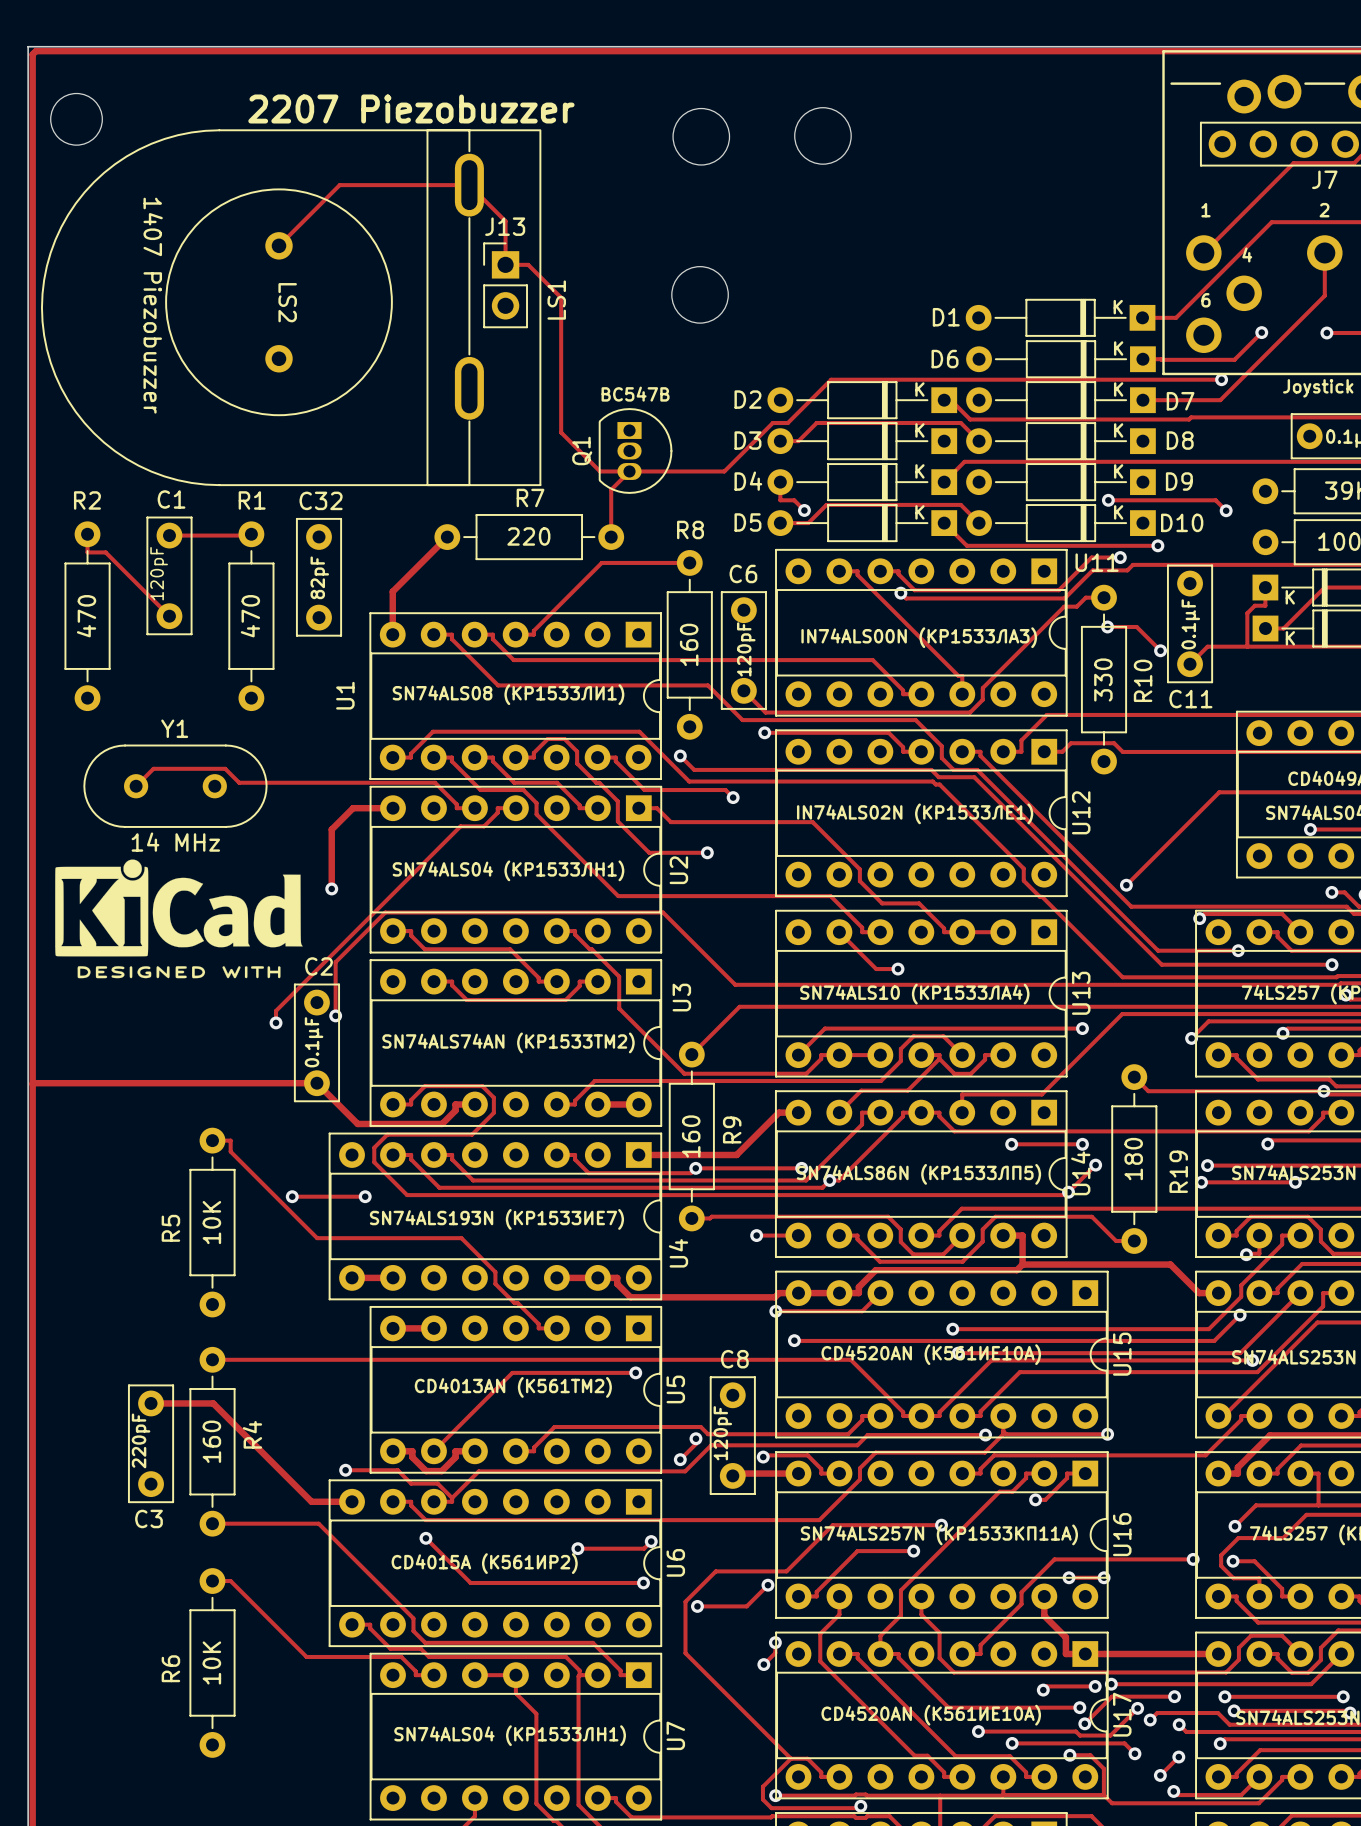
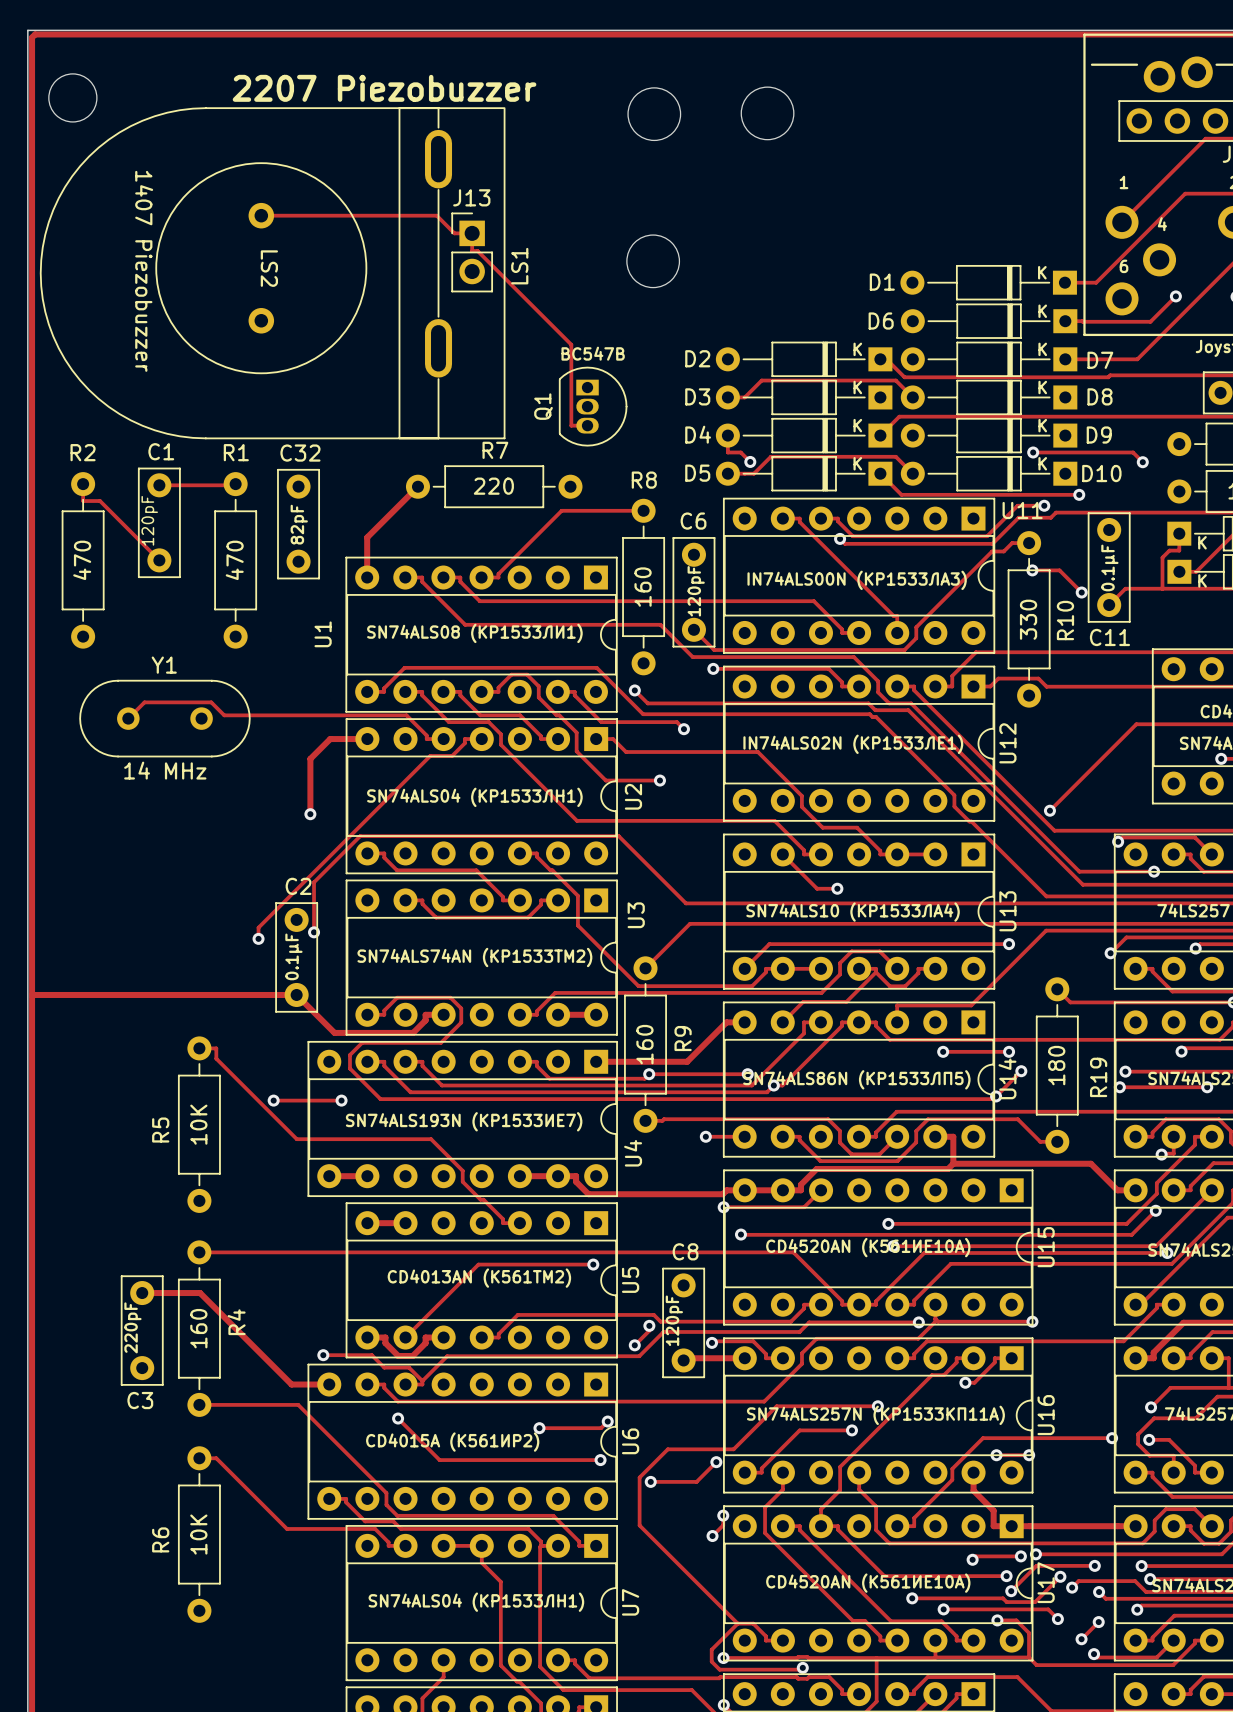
track: (279, 245) (339, 185) (469, 185) (505, 221) (505, 264) (528, 264) (561, 297) (561, 432) (600, 471) (612, 471) -> (261, 215) (436, 215) (454, 233) (472, 233) (472, 251) (477, 251) (571, 344) (571, 425)
track: (1221, 379) (831, 379) (787, 423) (772, 423) (724, 471) (629, 471) (611, 489) (611, 537) -> none
via: (1221, 379) -> none
drawing: [55, 859, 303, 979] -> none

